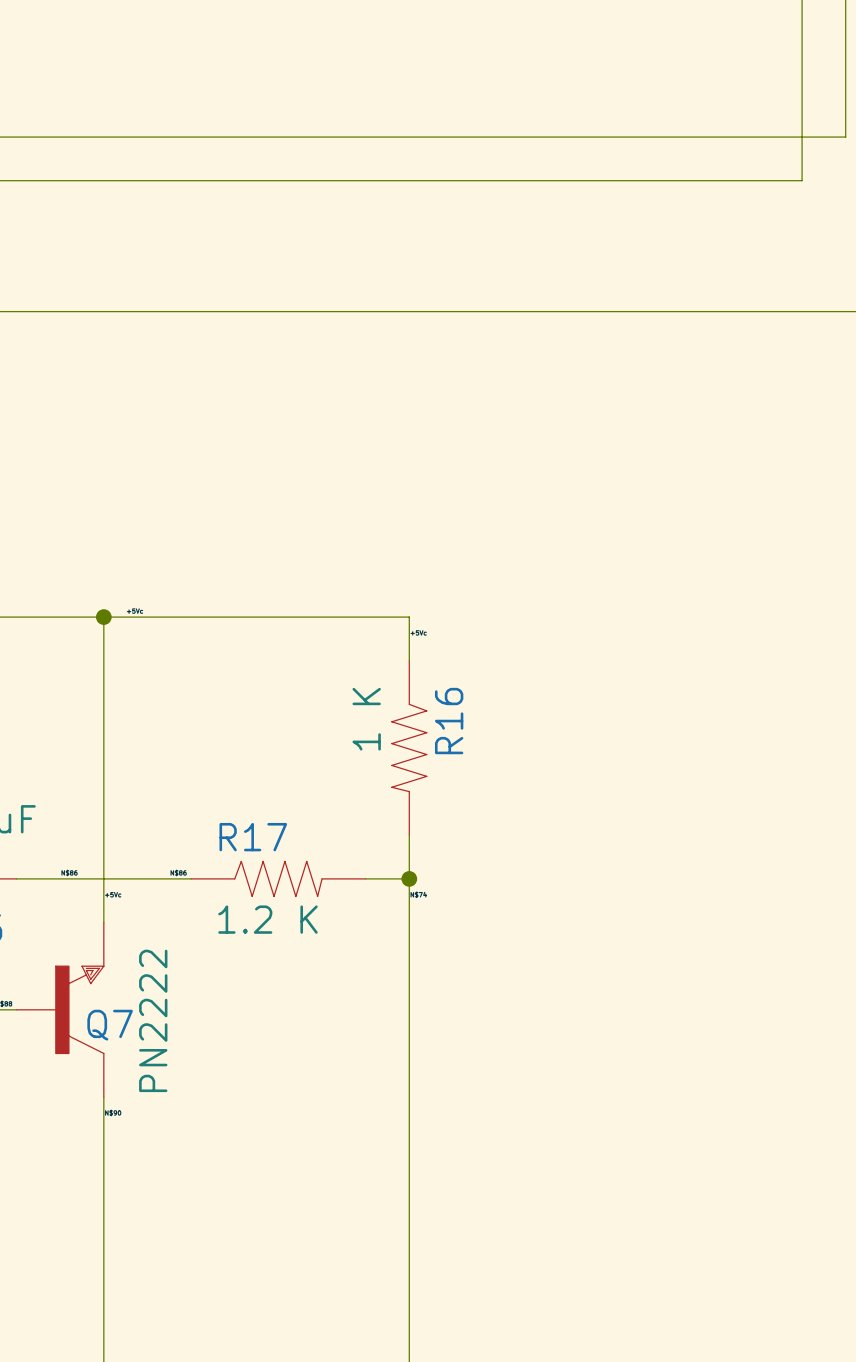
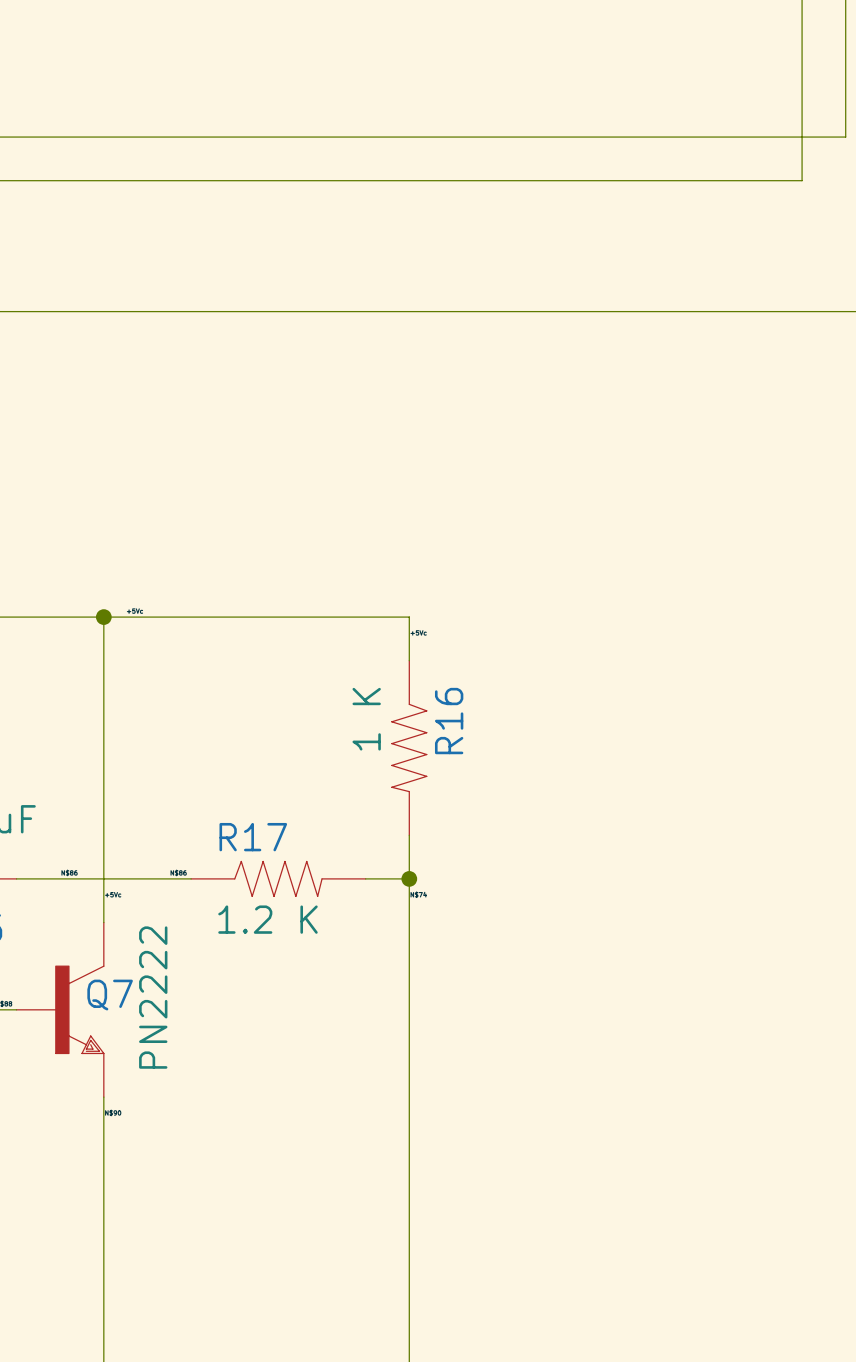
Q7 flip: as is (79, 1009) -> up-down (79, 1009)

